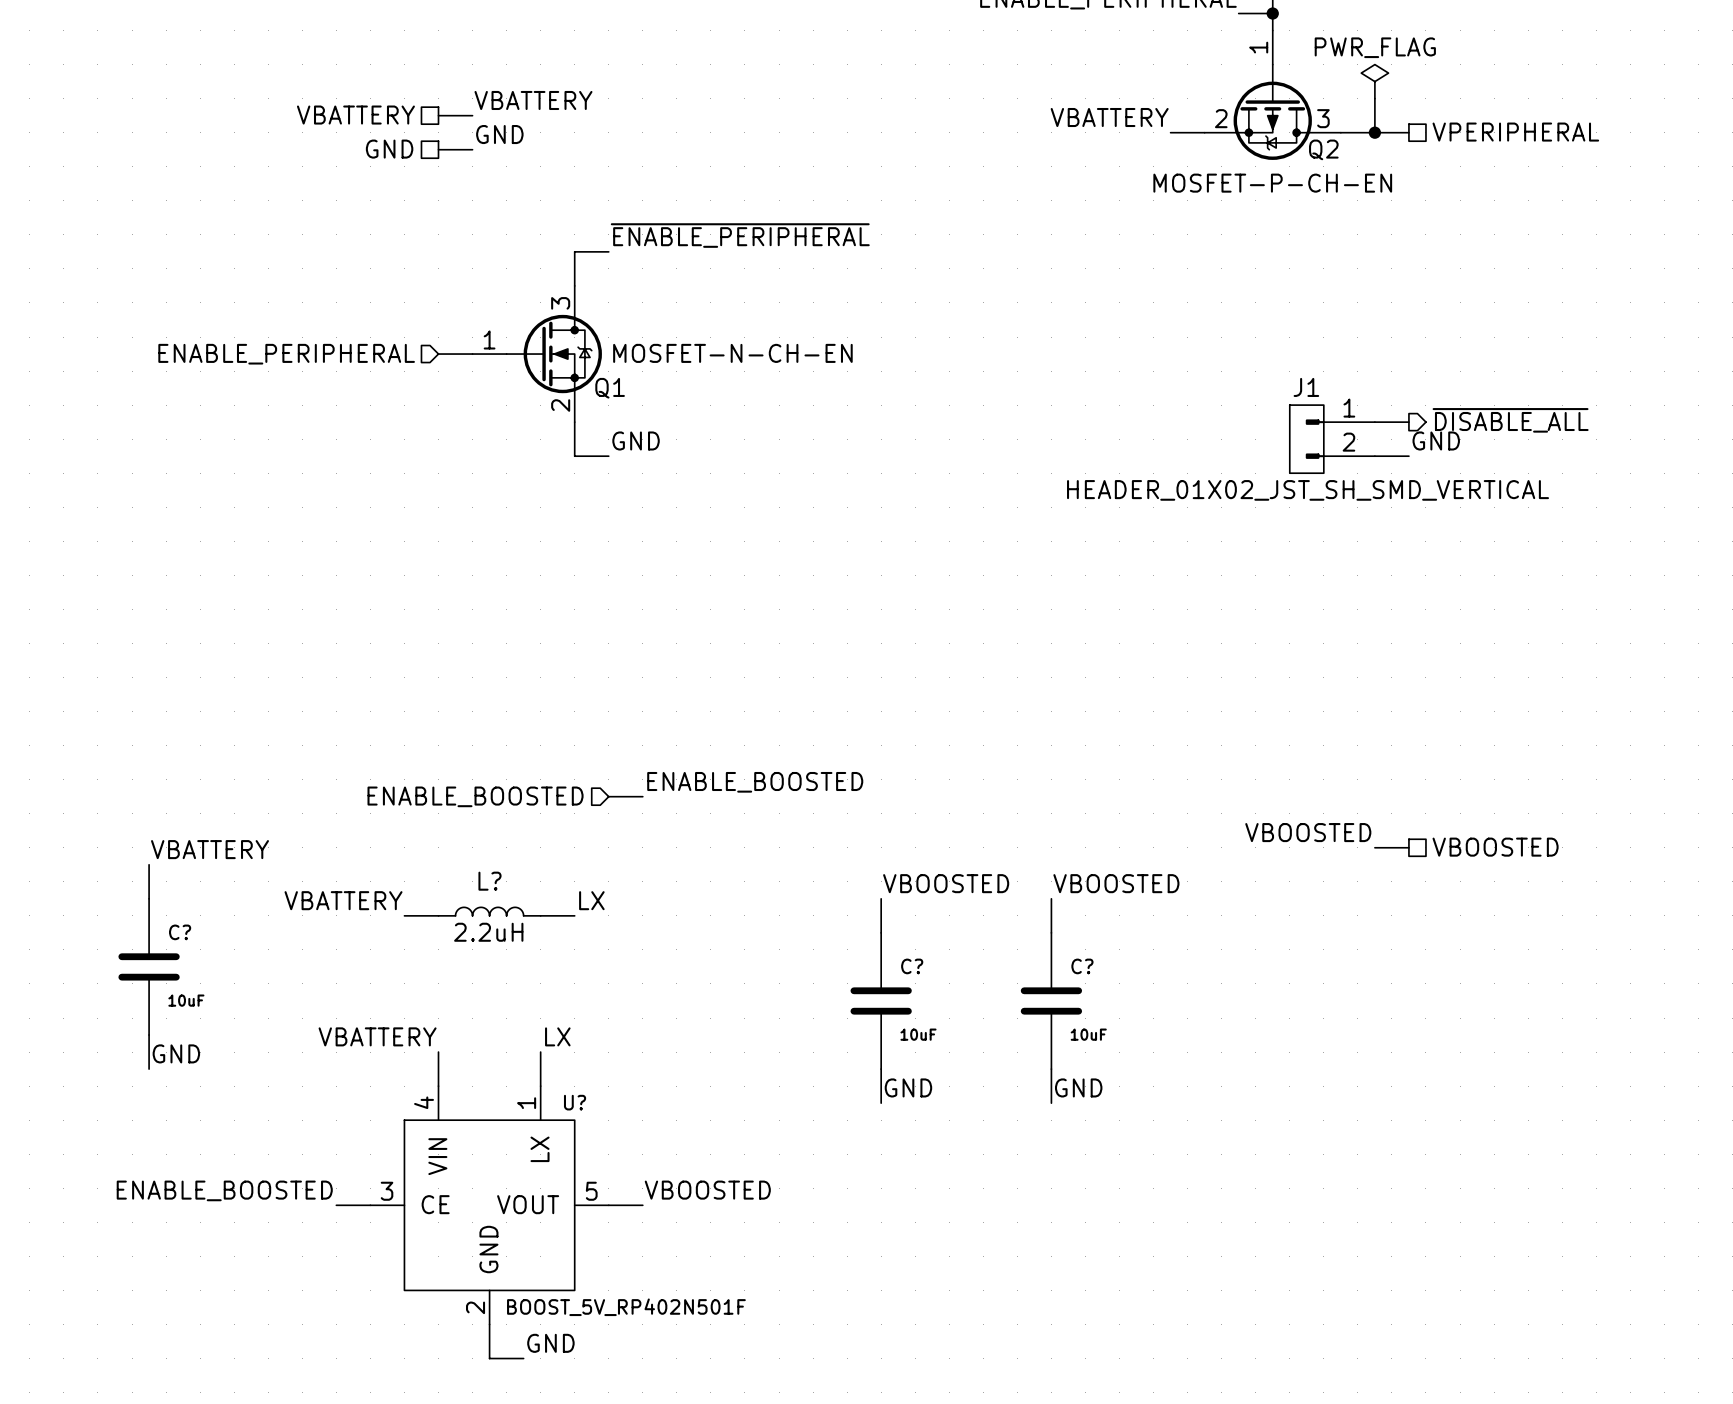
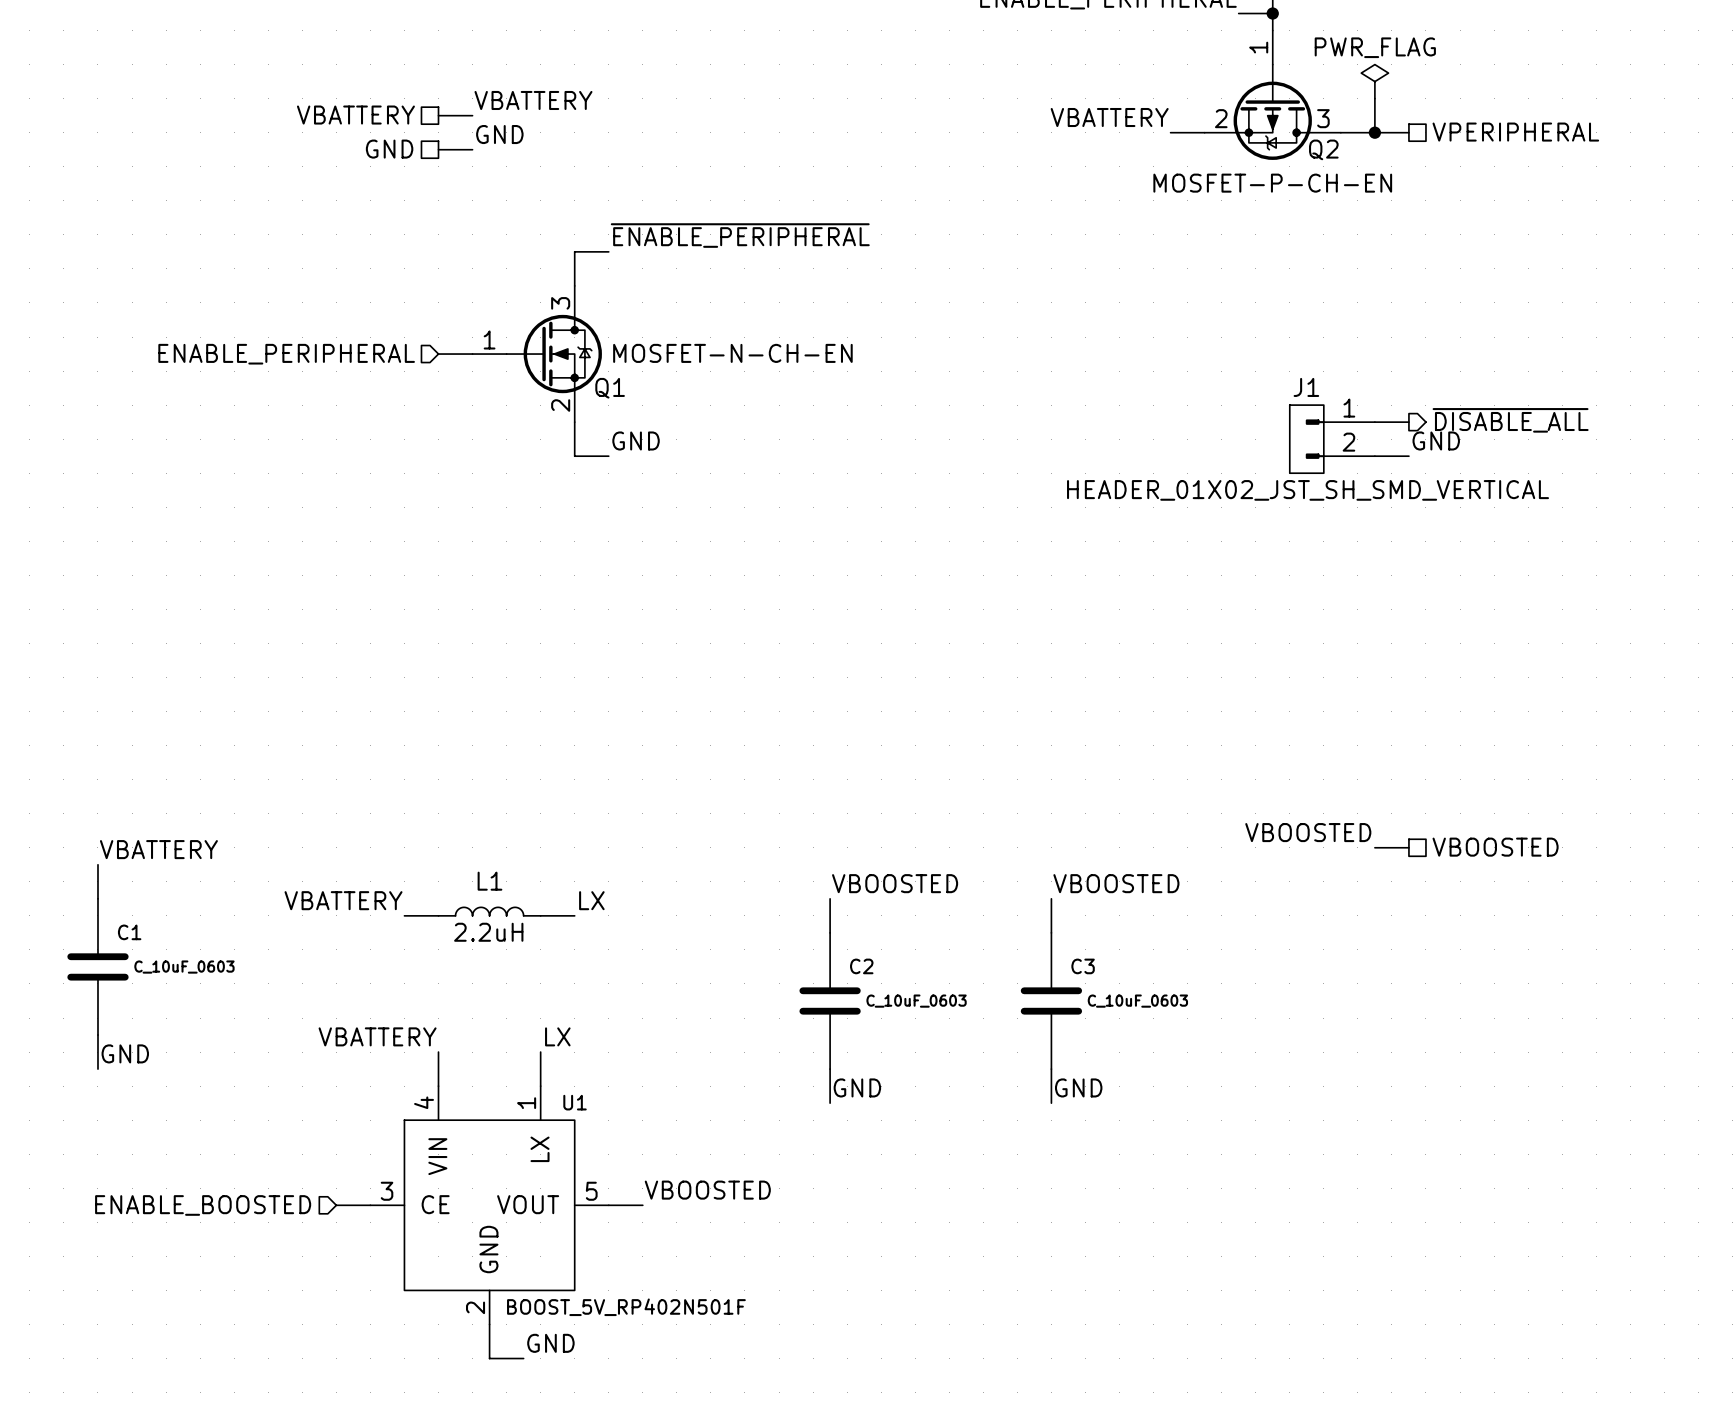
label: ENABLE_BOOSTED (755, 782) -> none
hierarchical label: ENABLE_BOOSTED (475, 796) -> none
wire: (608, 796) (642, 796) -> none
label position: VBATTERY (210, 849) -> VBATTERY (158, 849)
wire: (149, 864) (149, 898) -> (97, 864) (97, 898)
L? name: L? (489, 881) -> L1 (489, 881)
label position: VBOOSTED (946, 883) -> VBOOSTED (895, 883)
wire: (881, 898) (881, 932) -> (830, 898) (830, 932)
C1: none -> C_10uF_0603 (97, 966)
C?: 10uF (149, 966) -> none
C? name: C? (1082, 966) -> C3 (1083, 966)
C2: none -> C_10uF_0603 (830, 1000)
C?: 10uF (881, 1000) -> none
C? value: 10uF (1088, 1034) -> C_10uF_0603 (1137, 1001)
wire: (149, 1035) (149, 1069) -> (97, 1035) (97, 1069)
label position: GND (176, 1053) -> GND (125, 1053)
wire: (881, 1069) (881, 1103) -> (830, 1069) (830, 1103)
label position: GND (908, 1087) -> GND (857, 1087)
U? name: U? (575, 1102) -> U1 (575, 1102)
label: ENABLE_BOOSTED (224, 1190) -> none
hierarchical label: none -> ENABLE_BOOSTED (203, 1205)

